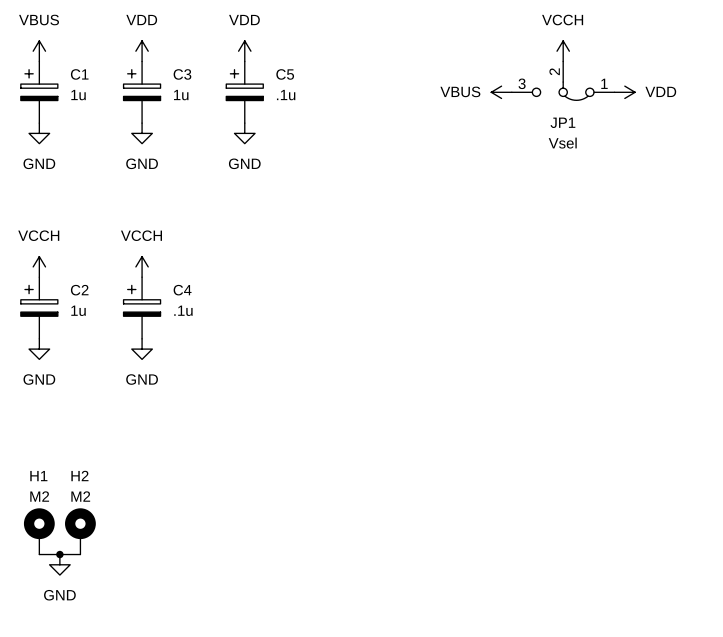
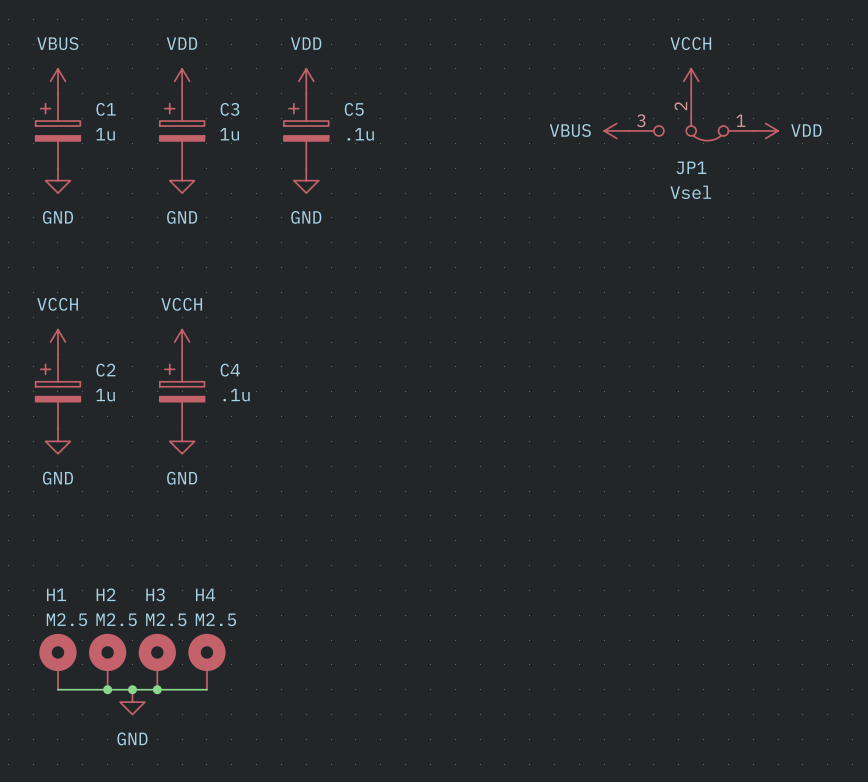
H1 value: M2 (39, 496) -> M2.5 (66, 619)
H2 value: M2 (80, 496) -> M2.5 (116, 619)
H3: none -> M2.5 (157, 661)
H4: none -> M2.5 (206, 661)
junction: (59, 554) -> none
wire: none -> (107, 689) (206, 689)
junction: none -> (107, 689)
junction: none -> (132, 689)
junction: none -> (157, 689)
power symbol position: GND (59, 564) -> GND (132, 702)

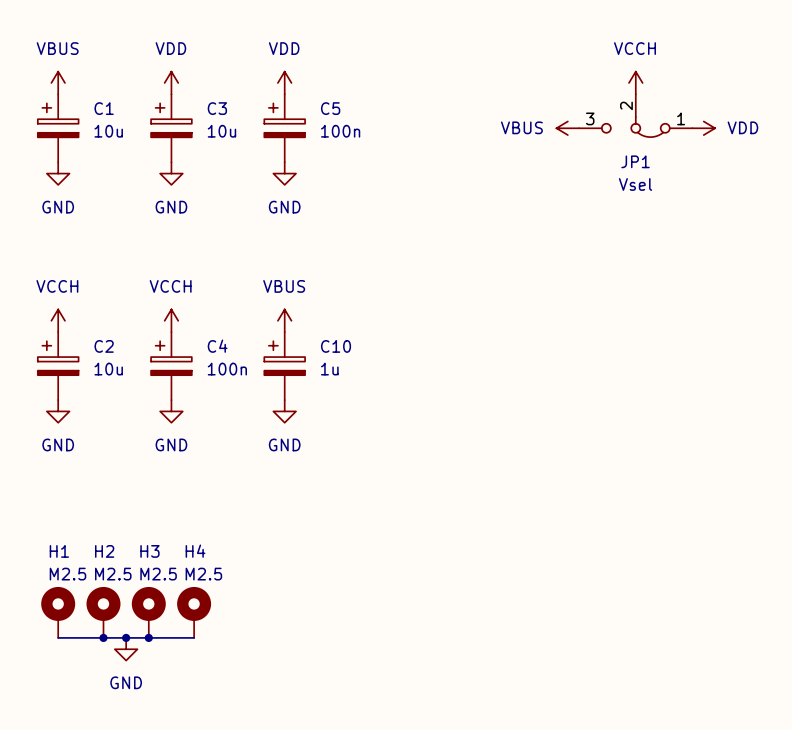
C1 value: 1u (105, 134) -> 10u (108, 131)
C3 value: 1u (229, 134) -> 10u (221, 131)
C5 value: .1u (360, 134) -> 100n (340, 131)
power symbol: none -> VBUS (284, 320)
C10: none -> 1u (284, 366)
C2 value: 1u (105, 395) -> 10u (108, 369)
C4 value: .1u (236, 395) -> 100n (227, 369)
power symbol: none -> GND (284, 411)

